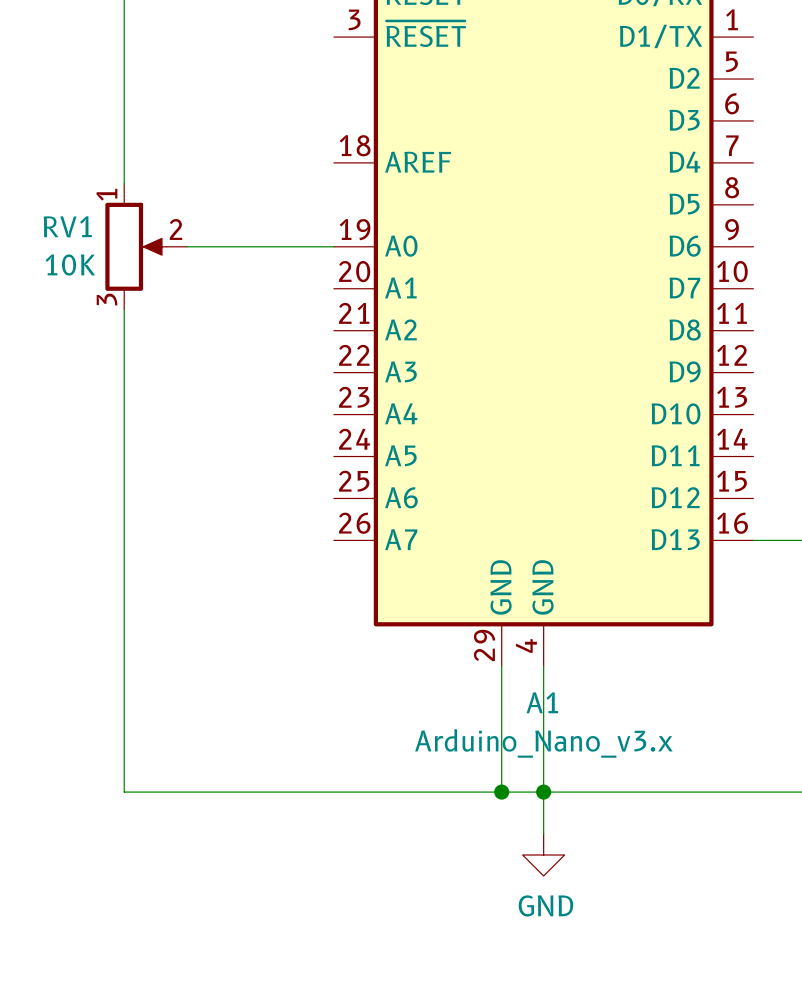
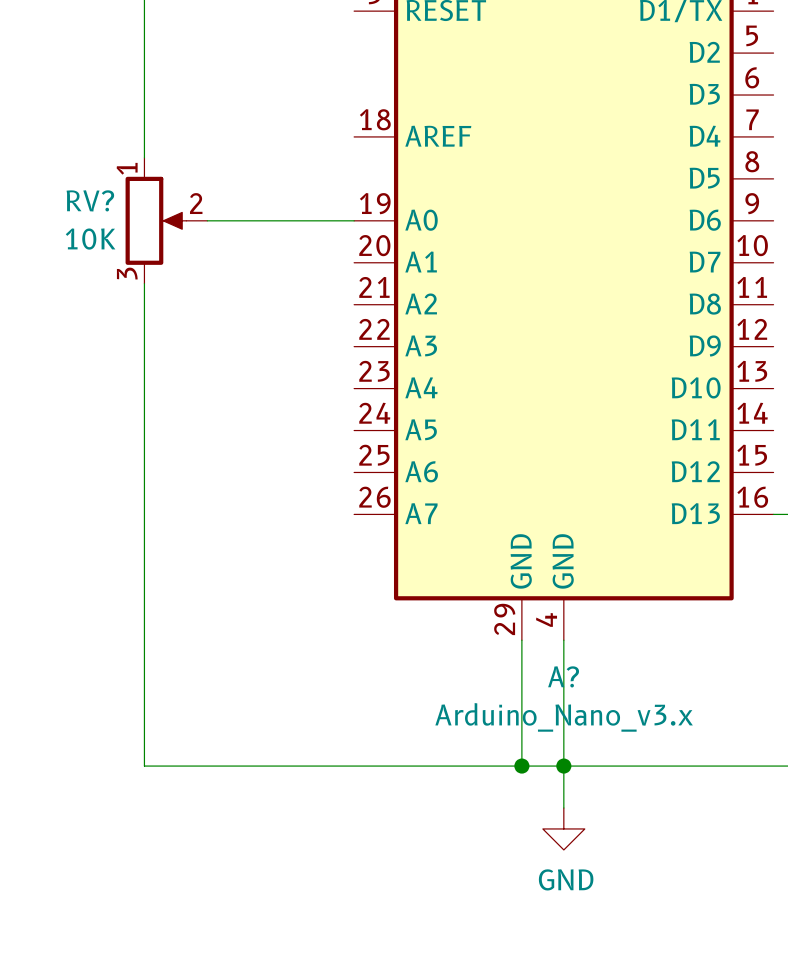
RV1 name: RV1 (67, 226) -> RV? (90, 200)
A1 name: A1 (542, 702) -> A? (563, 676)

